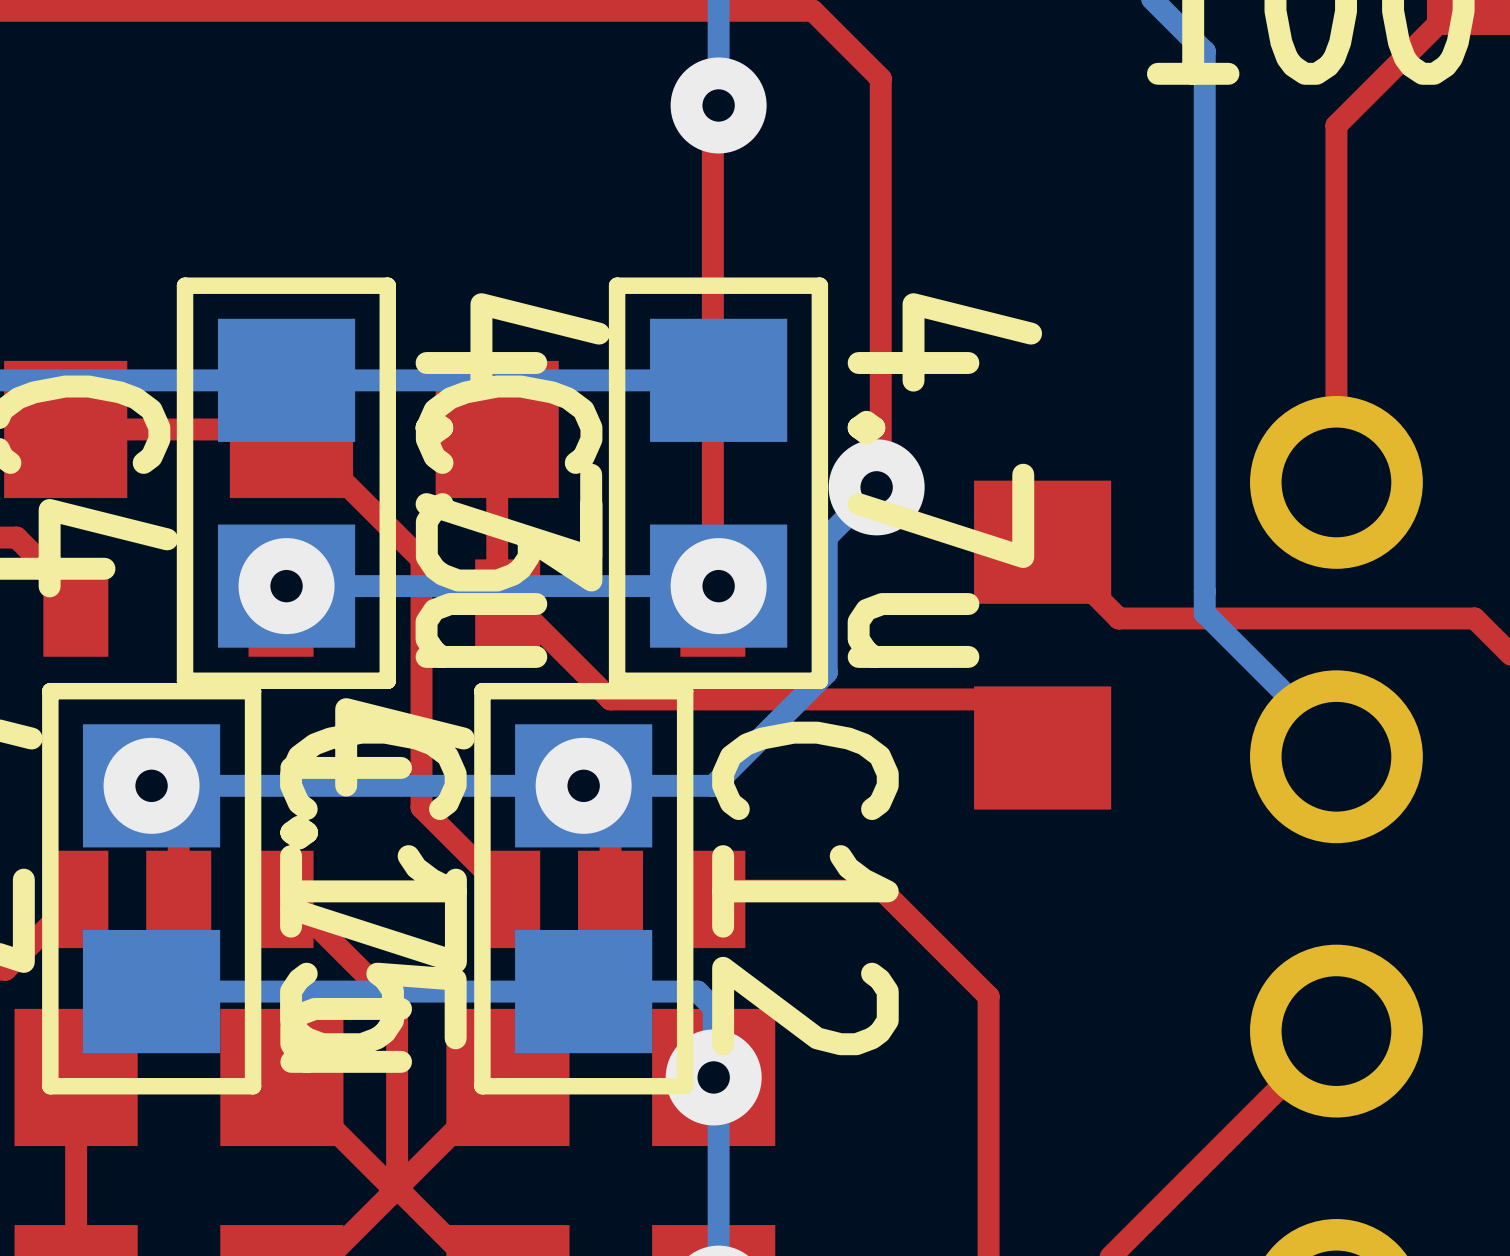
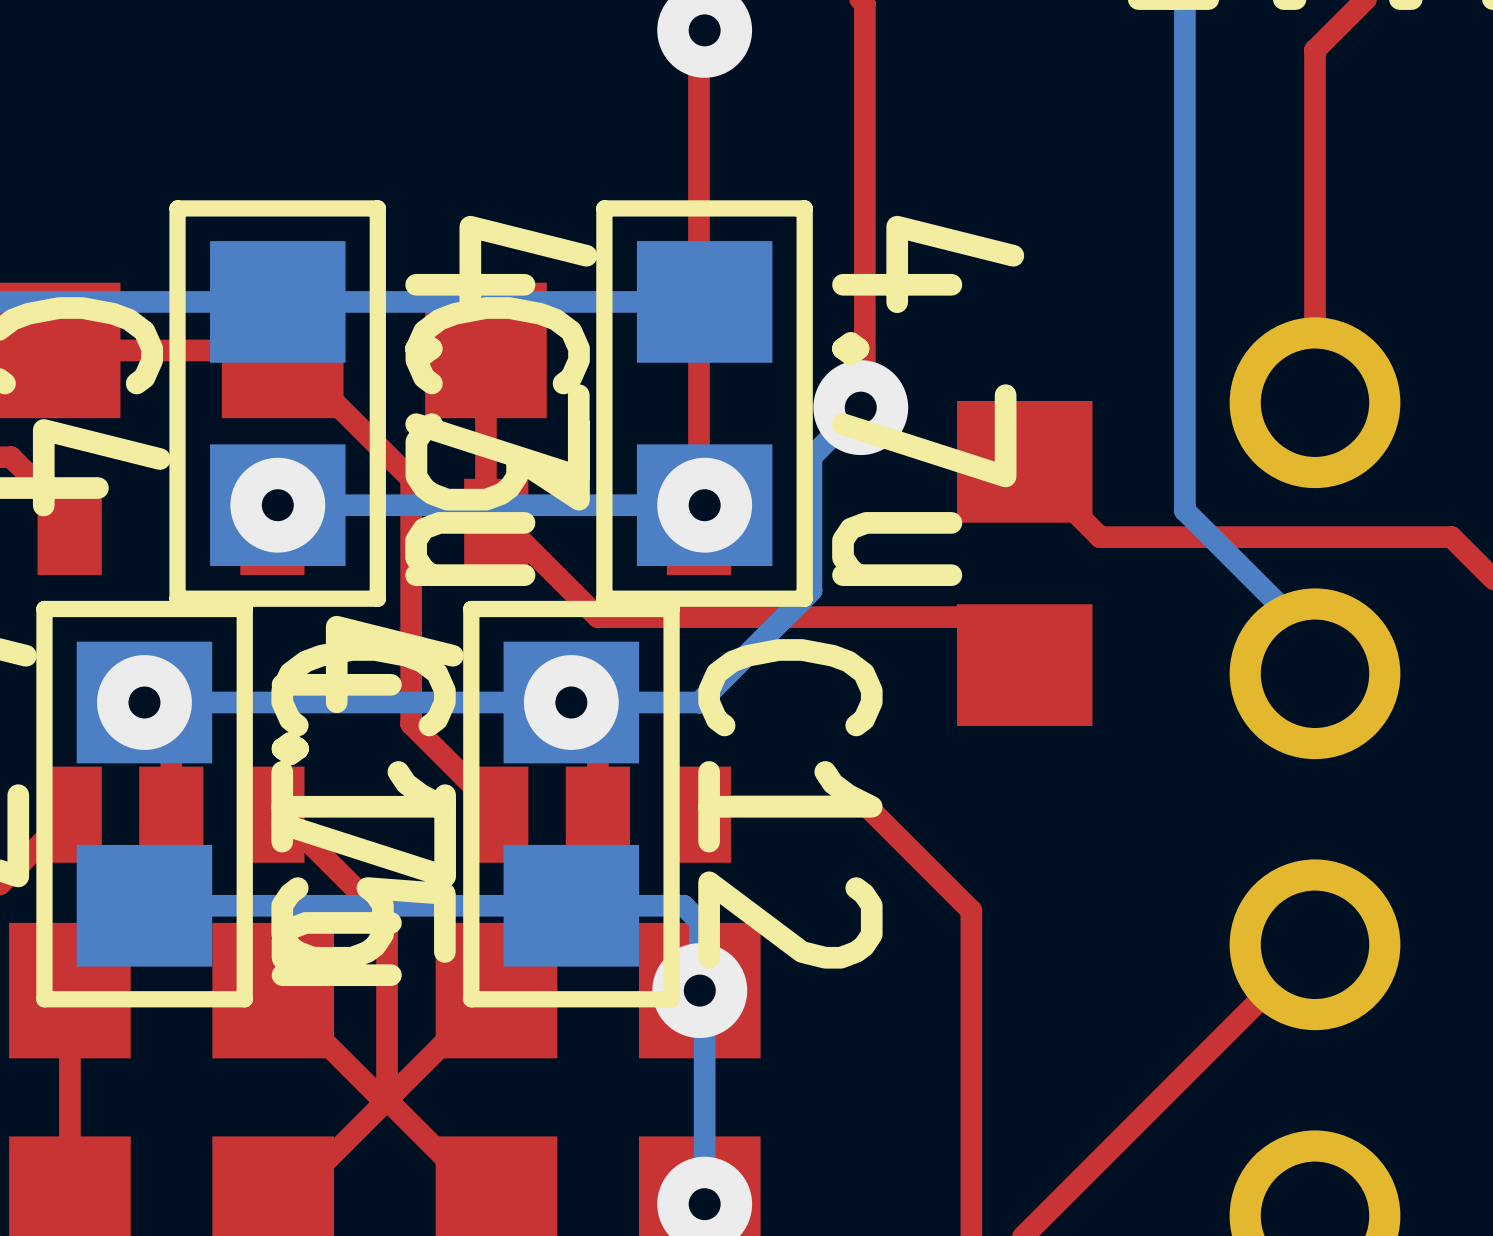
bottom track: (1204, 591) (1204, 613) (1336, 744) -> (1184, 510) (1315, 640) (1315, 662)

